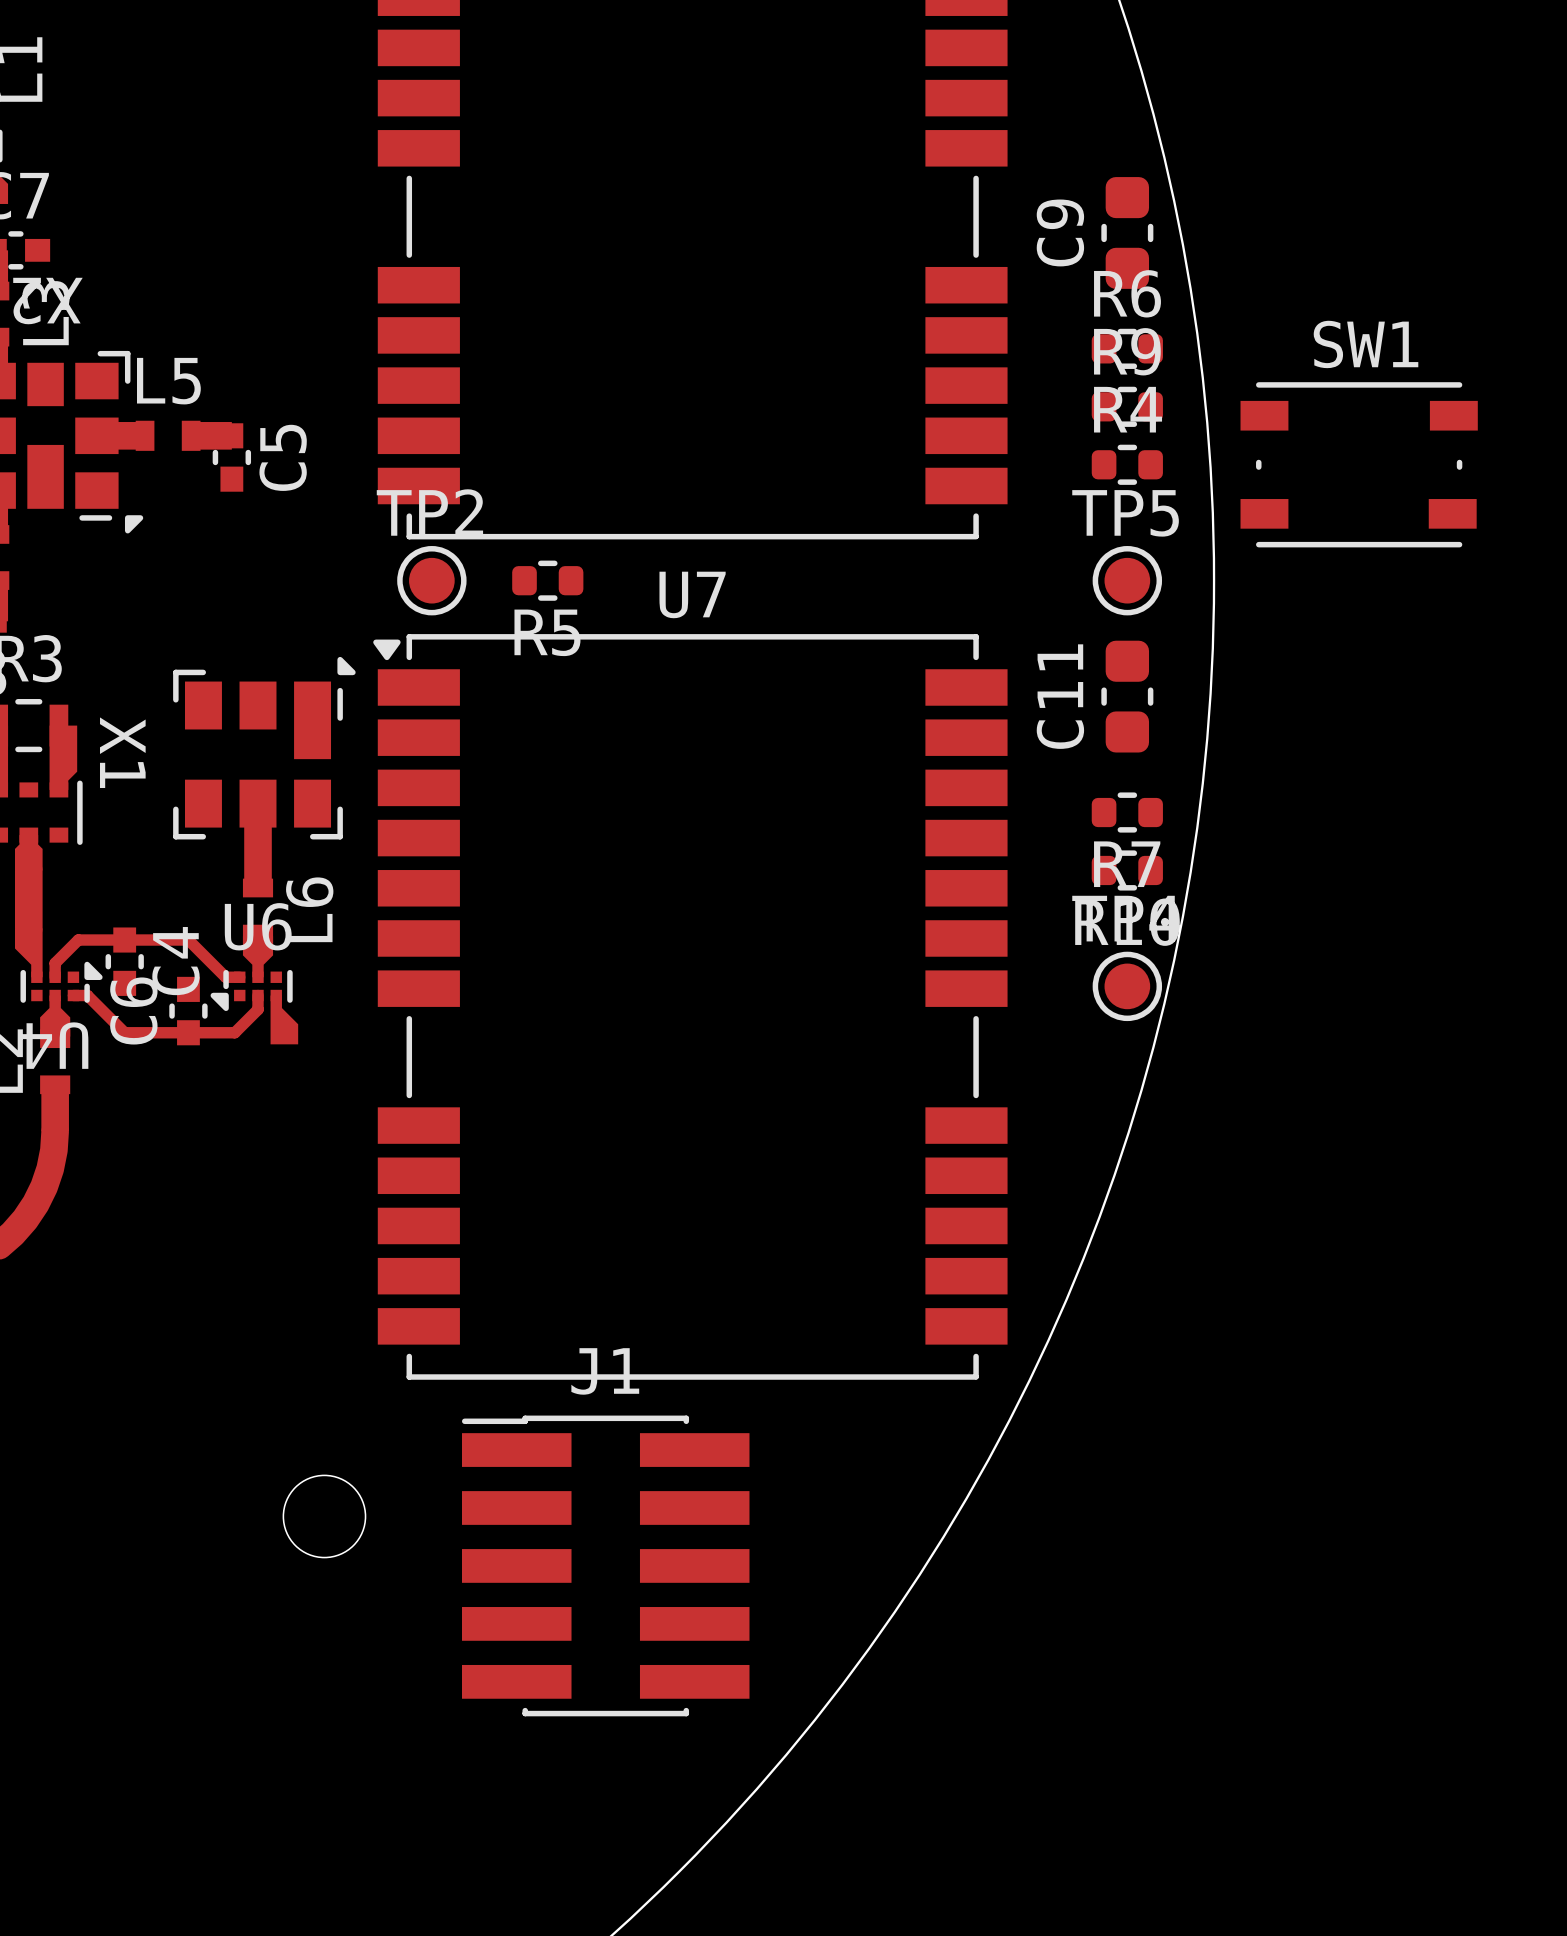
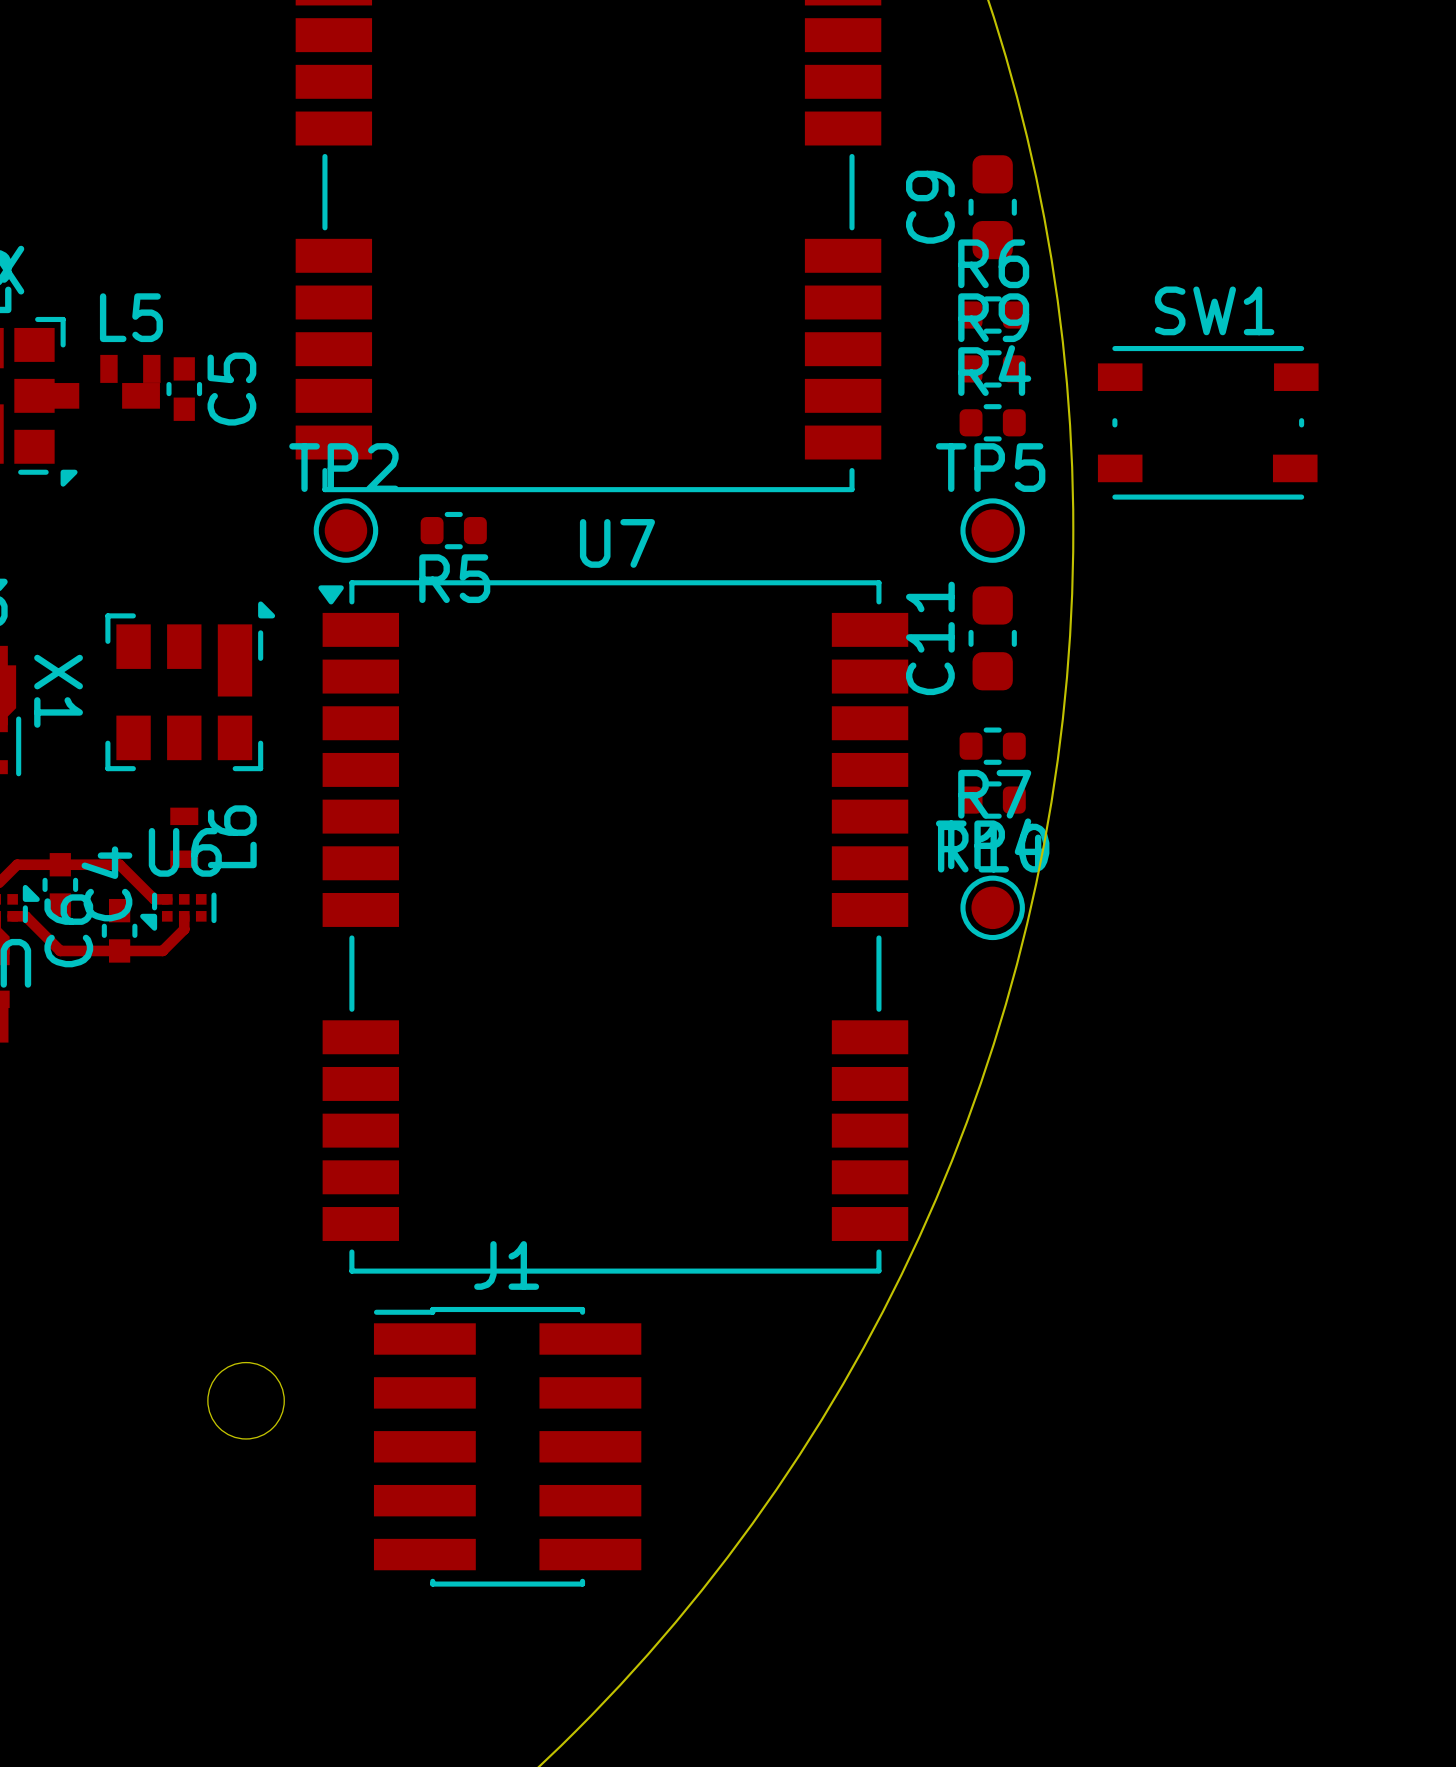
L5 position: (168, 435) -> (130, 368)
C5 position: (231, 457) -> (184, 389)
drawing: [242, 803, 299, 1045] -> none
U7 position: (690, 1006) -> (613, 926)

